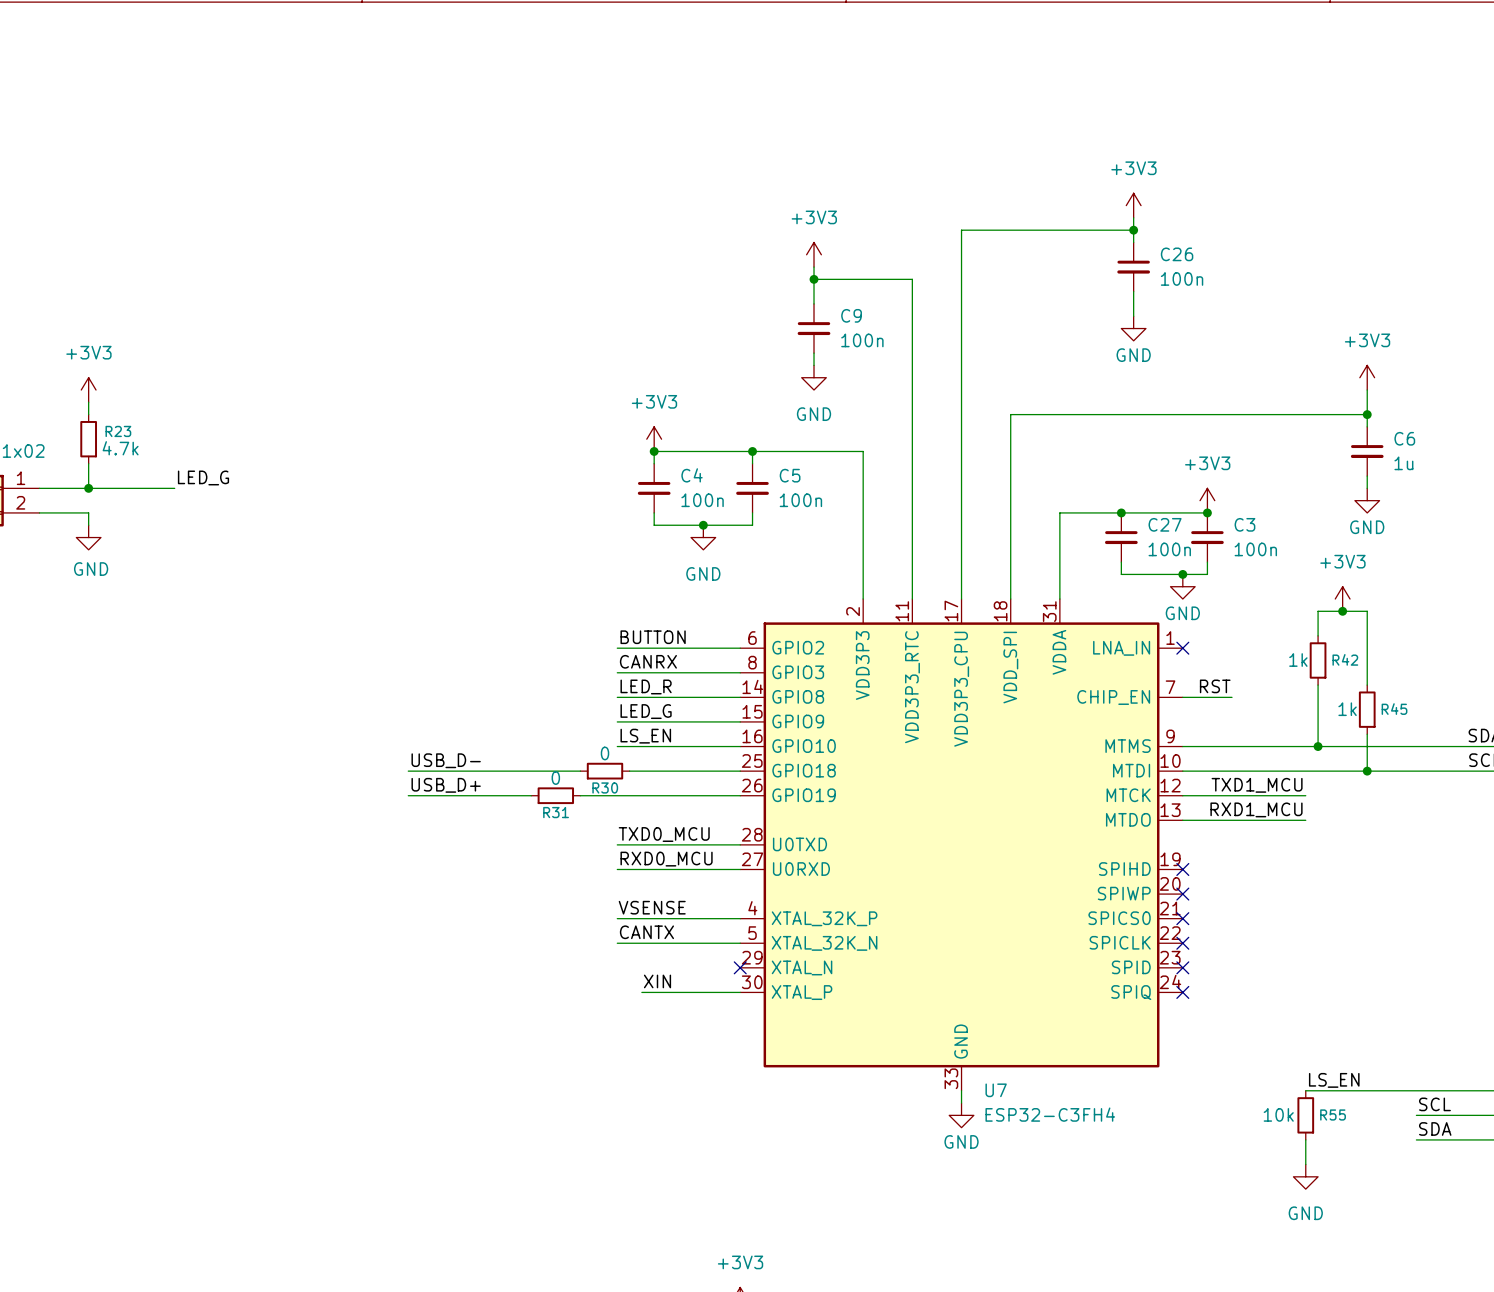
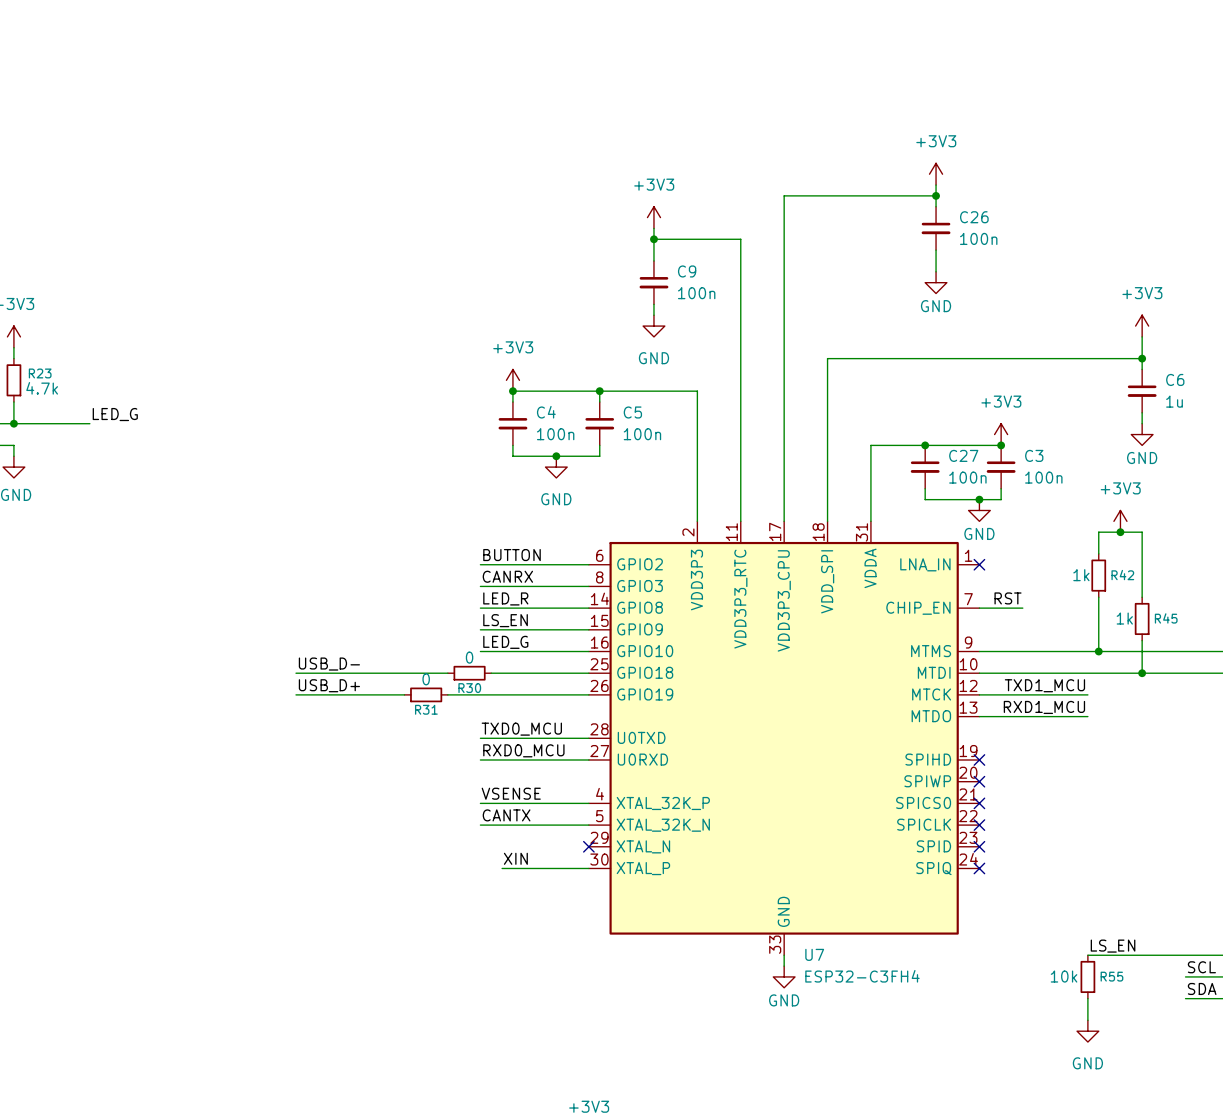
label: LED_G (646, 711) -> LS_EN (505, 620)
label: LS_EN (645, 736) -> LED_G (505, 642)

